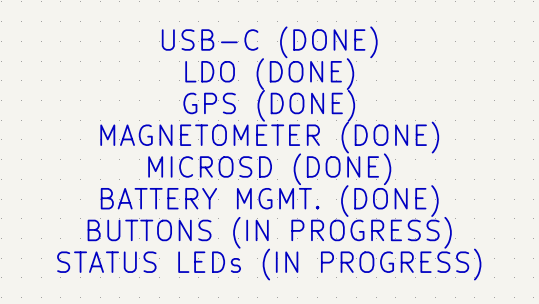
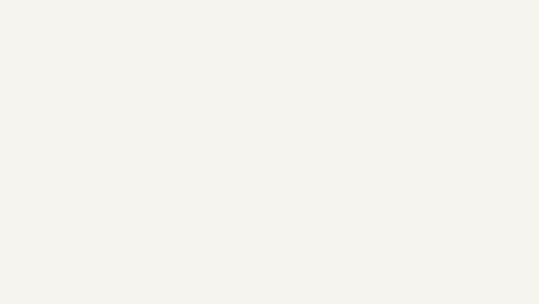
text: USB-C (DONE) (269, 42) -> none
text: LDO (DONE) (269, 74) -> none
text: GPS (DONE) (269, 105) -> none
text: MAGNETOMETER (DONE) (269, 137) -> none
text: MICROSD (DONE) (269, 169) -> none
text: BATTERY MGMT. (DONE) (269, 201) -> none
text: BUTTONS (IN PROGRESS) (269, 232) -> none
text: STATUS LEDs (IN PROGRESS) (269, 264) -> none

